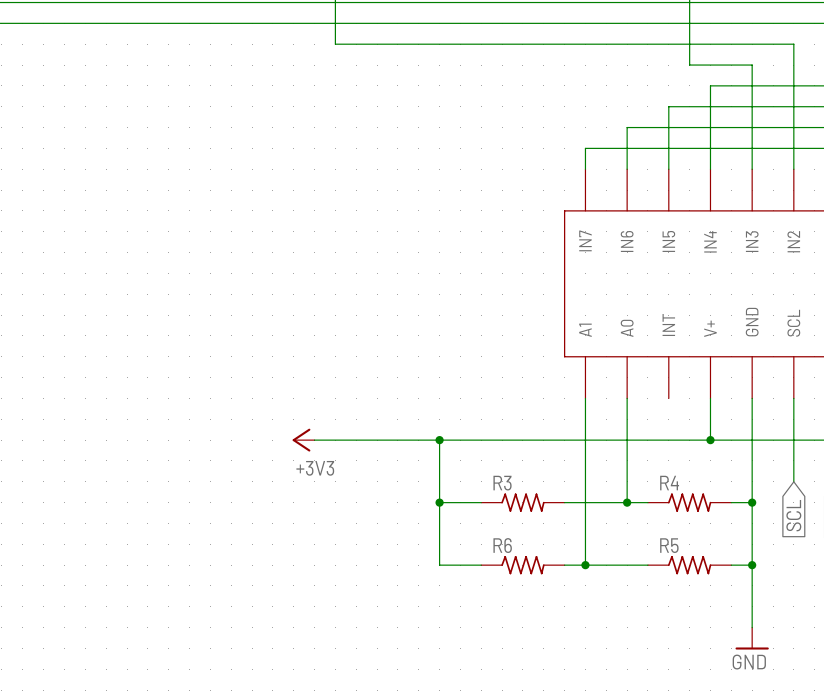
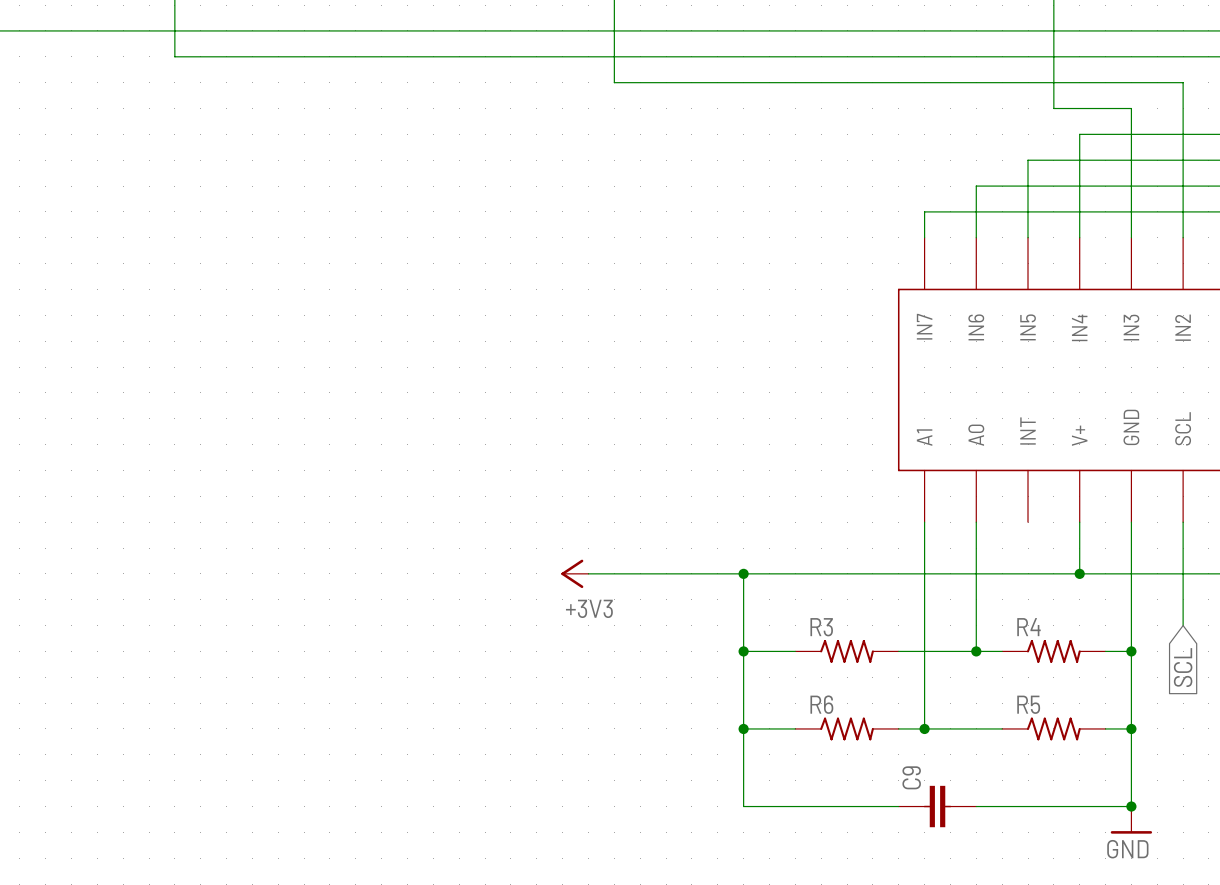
wire: none -> (743, 728) (743, 806) (898, 806)
junction: none -> (743, 728)
C9: none -> (937, 806)
wire: none -> (976, 806) (1131, 806)
junction: none -> (1131, 806)

